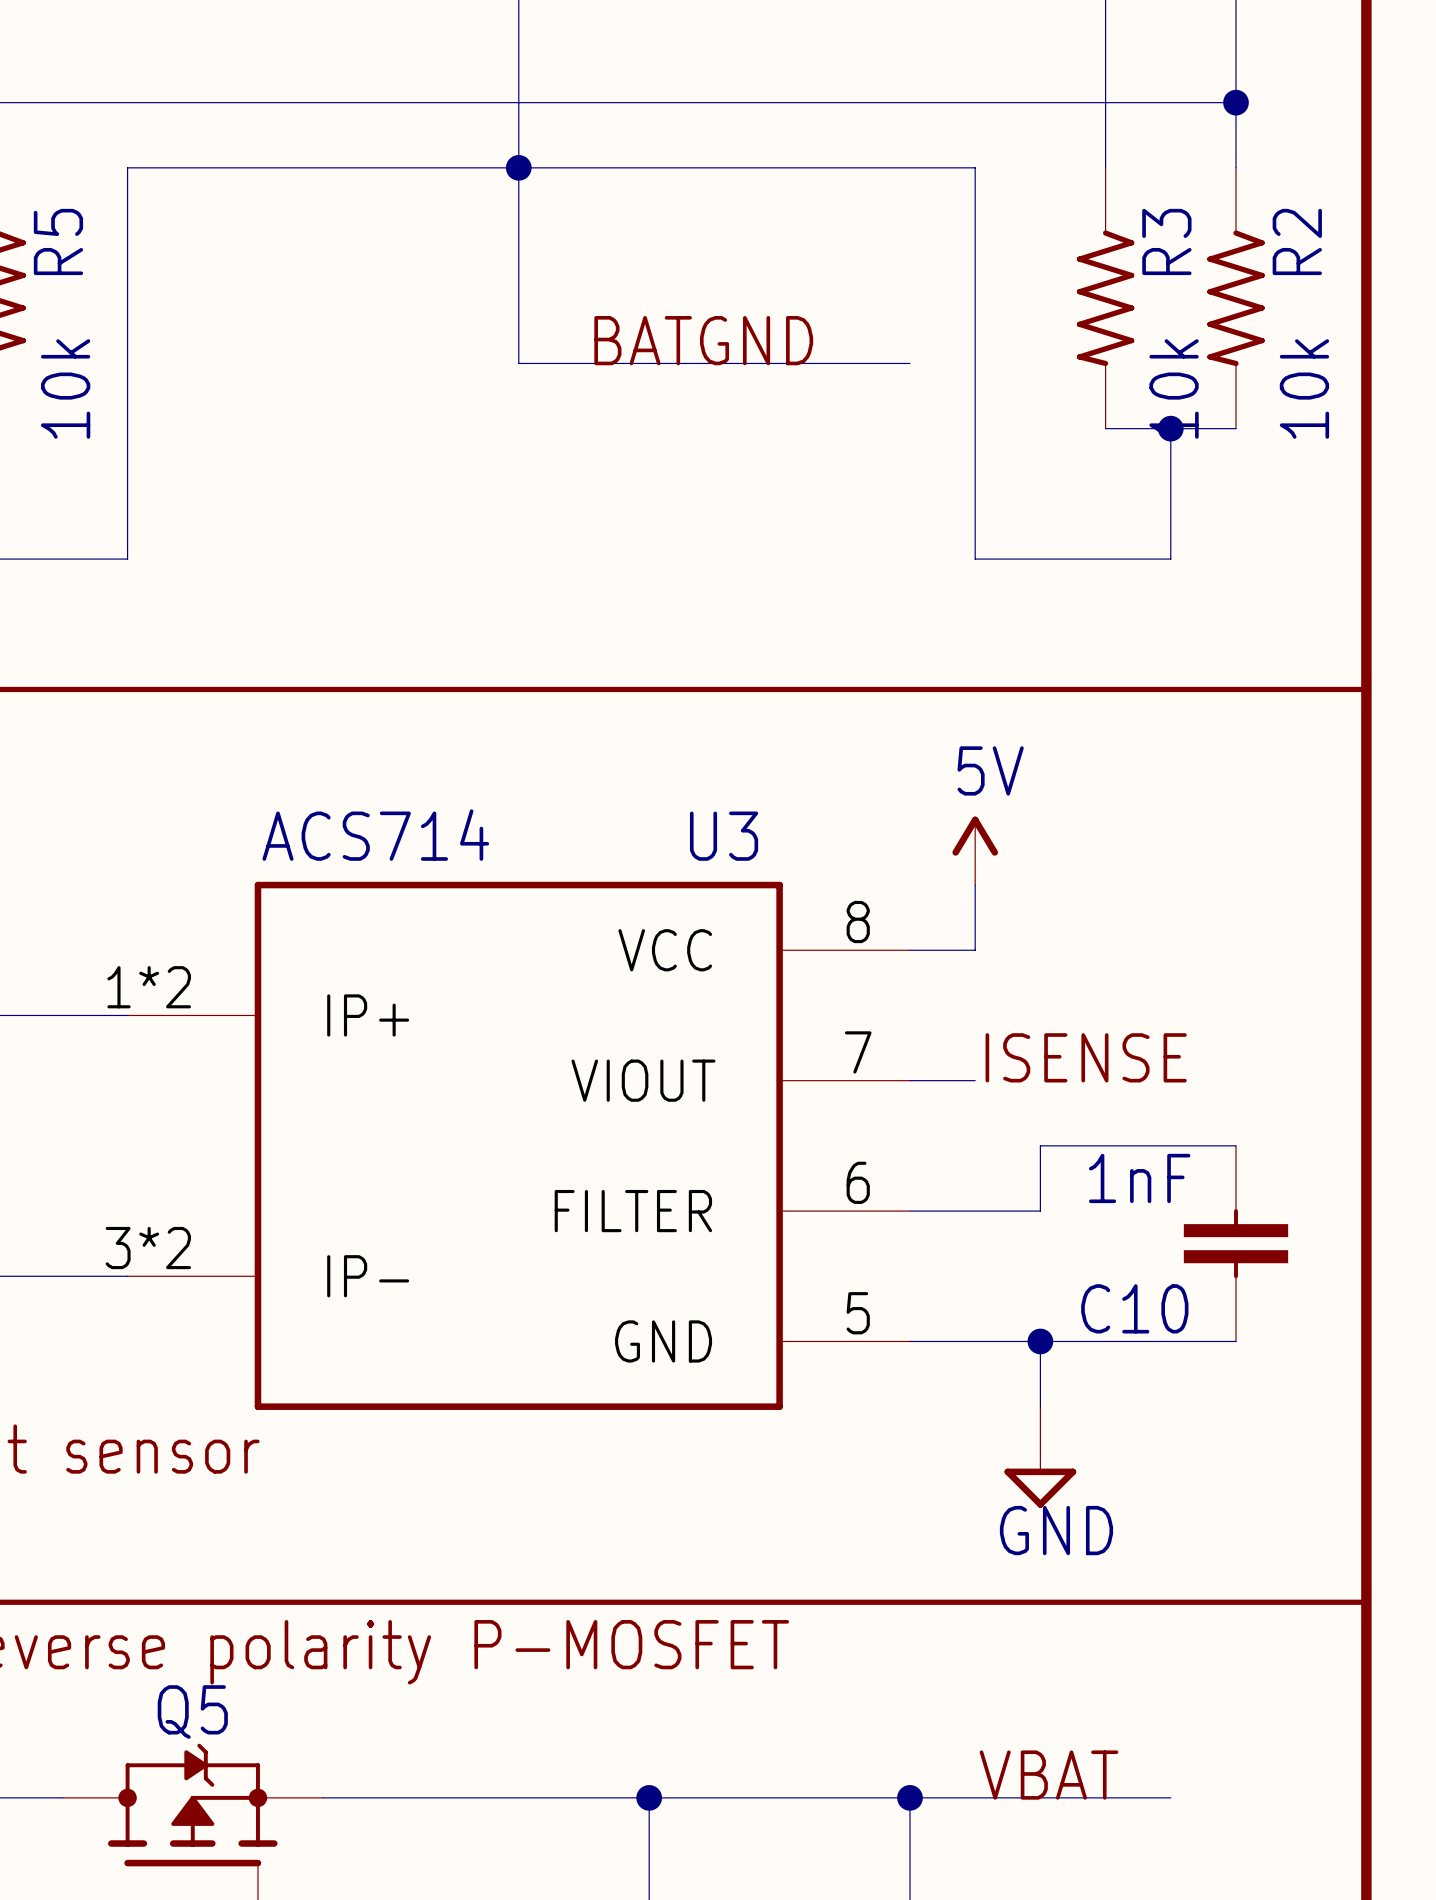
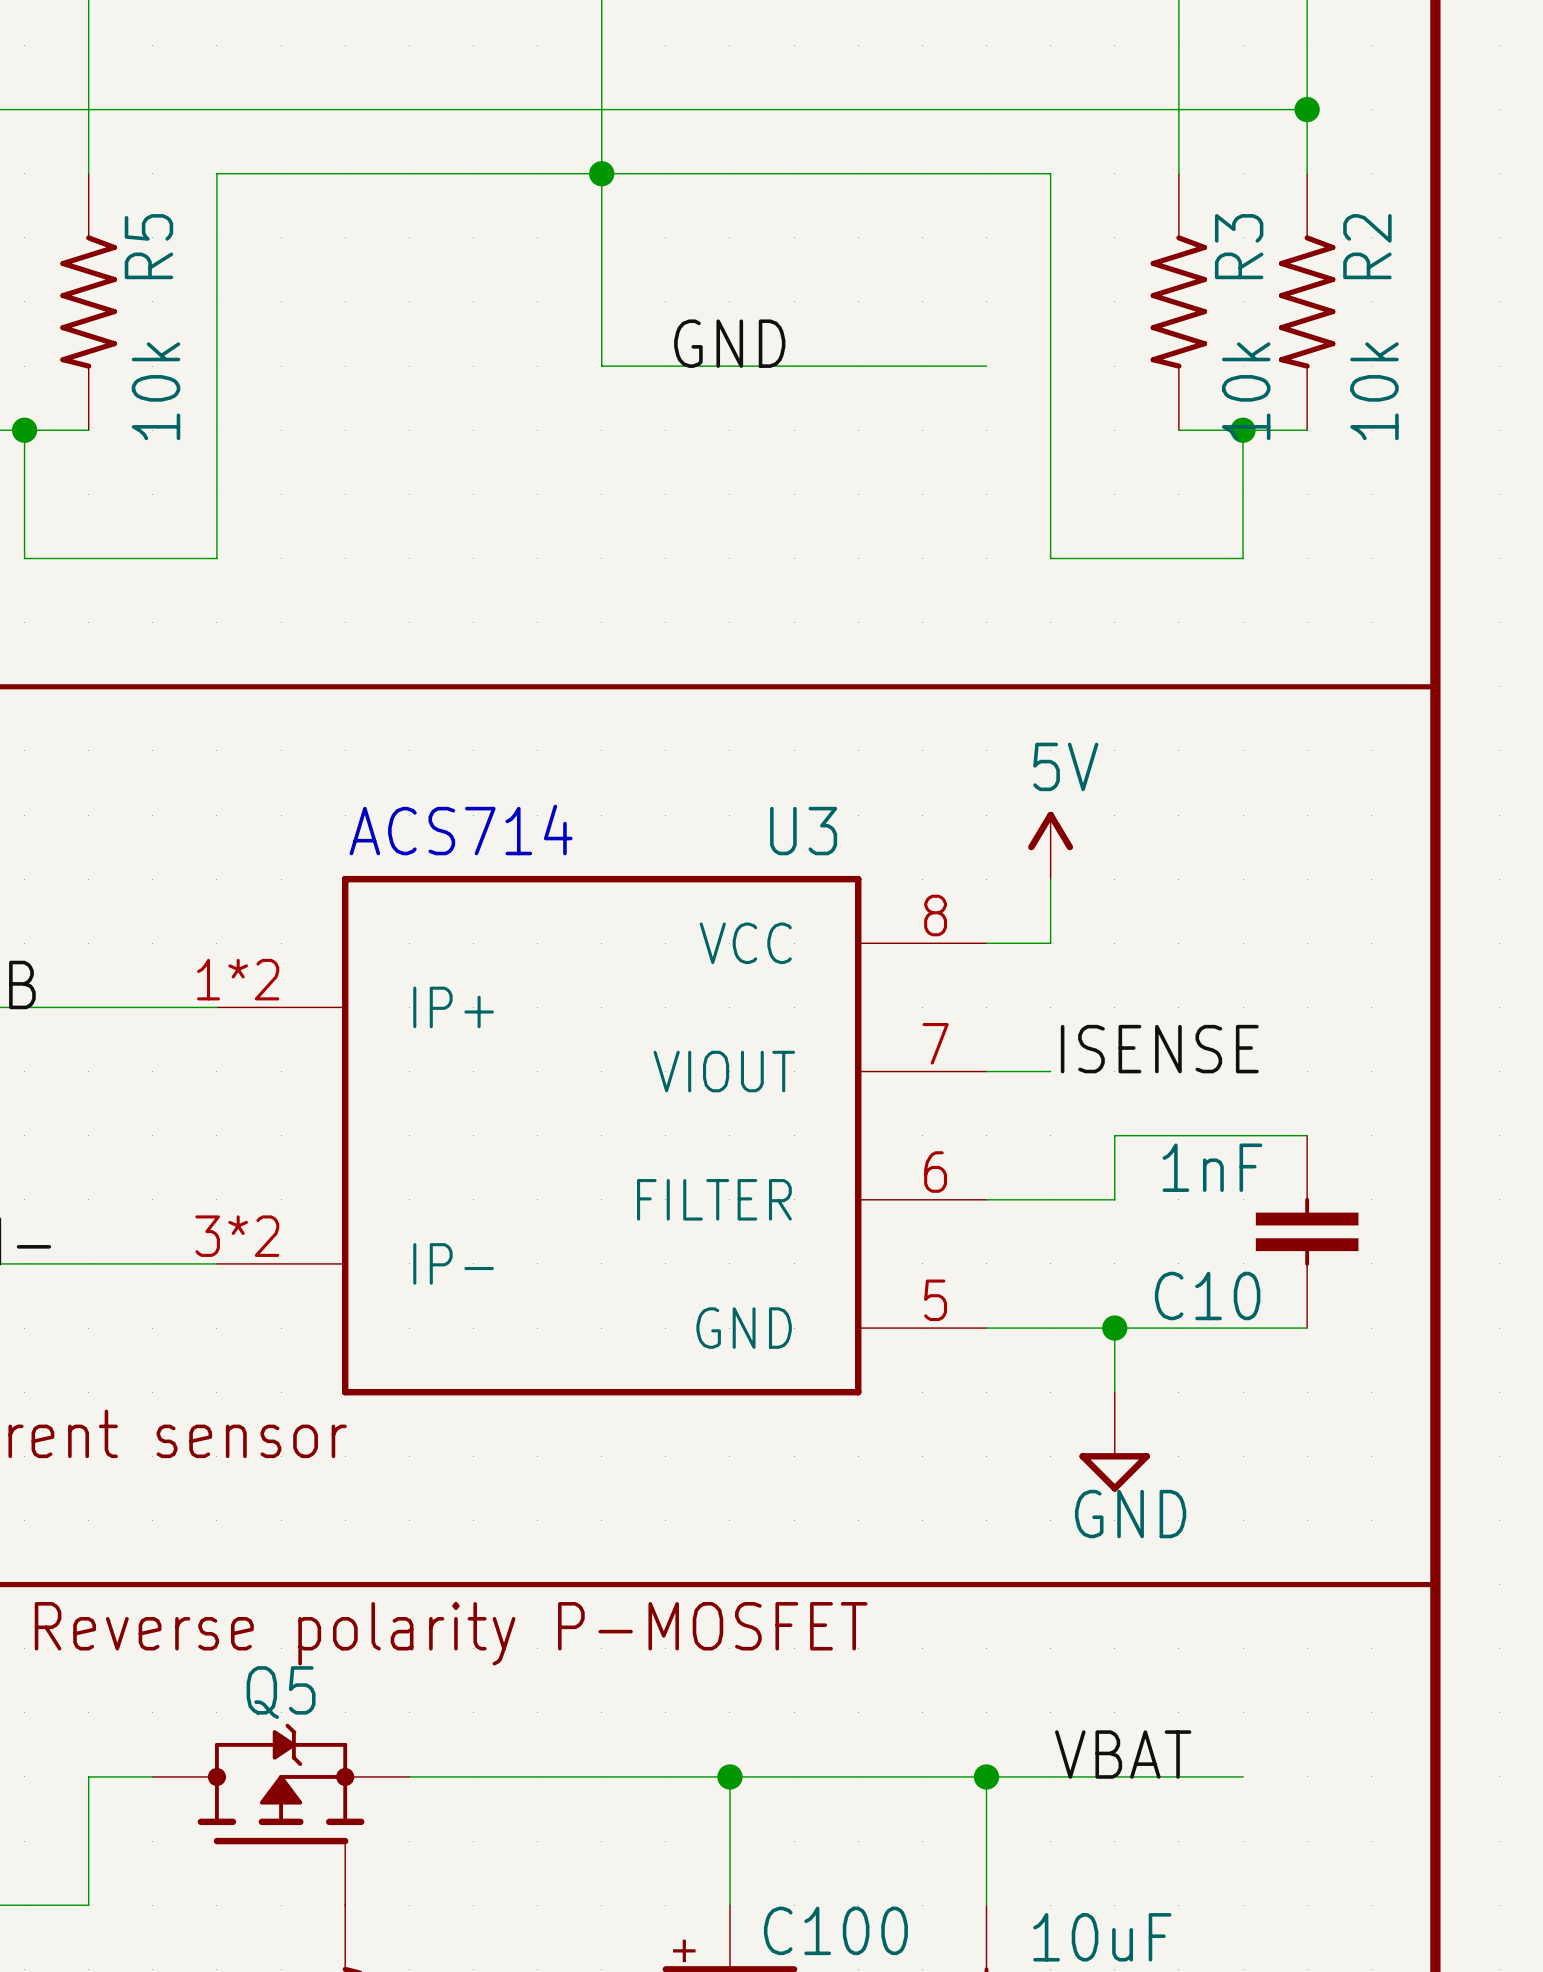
label: BATGND (703, 340) -> GND (729, 343)

